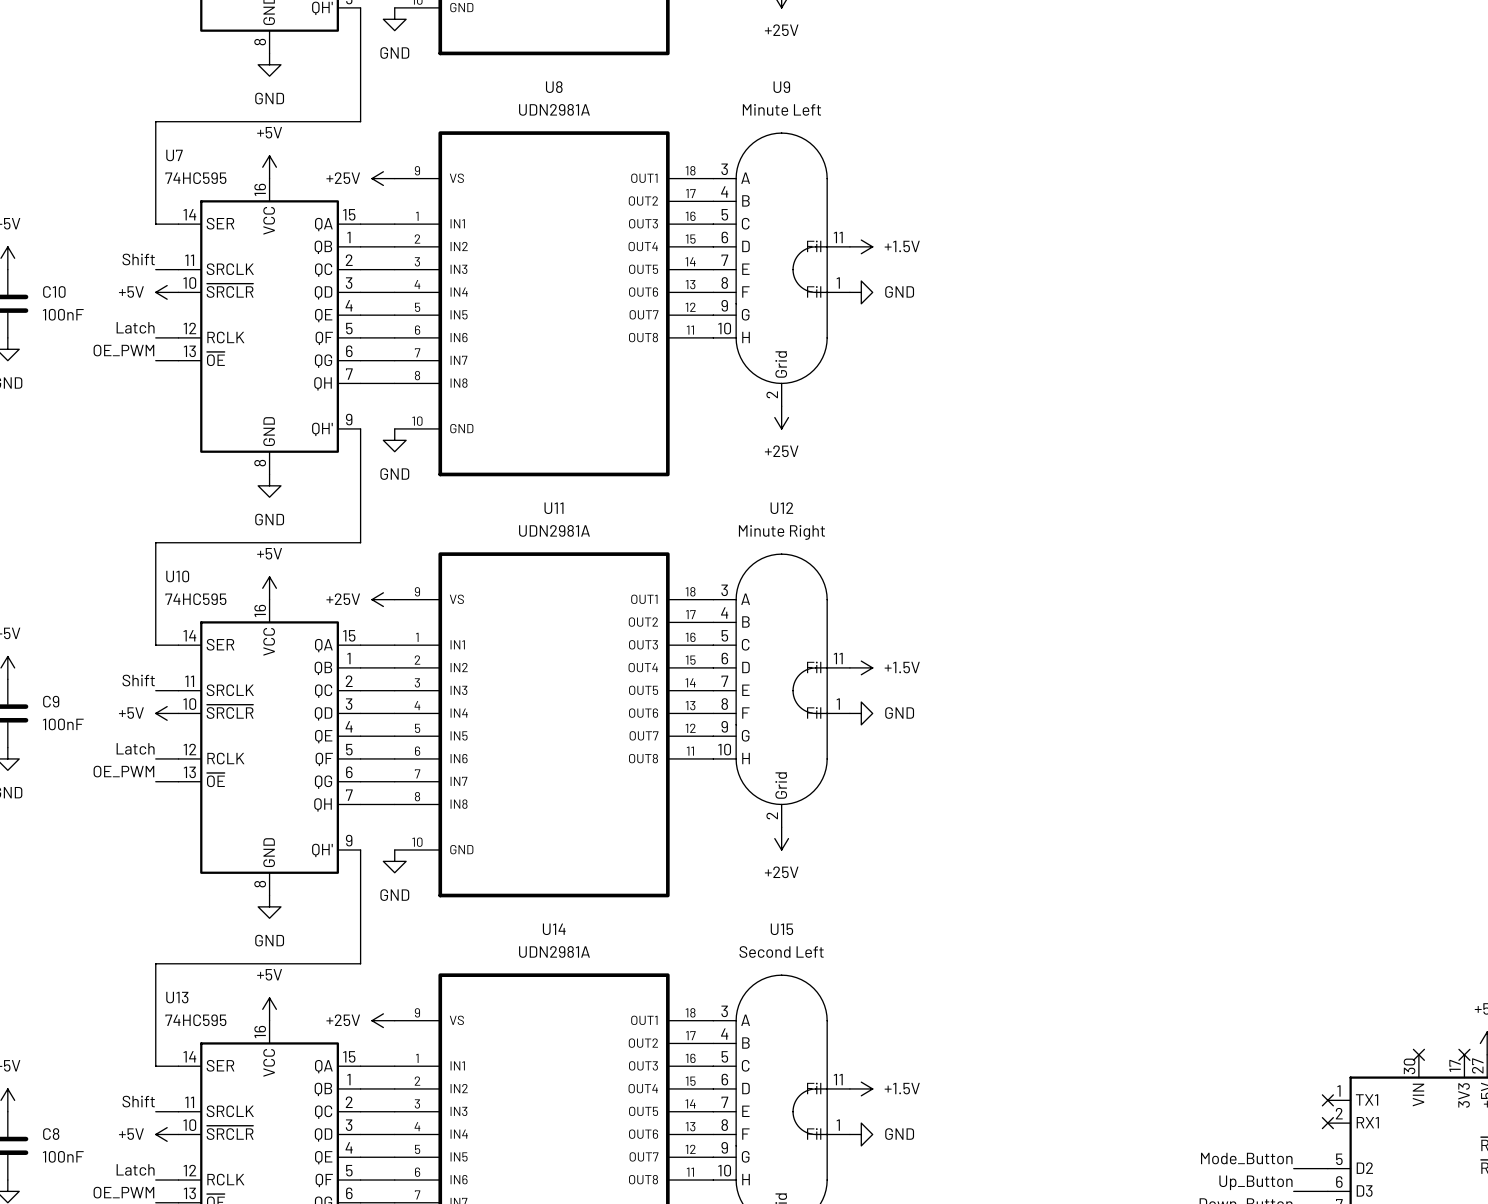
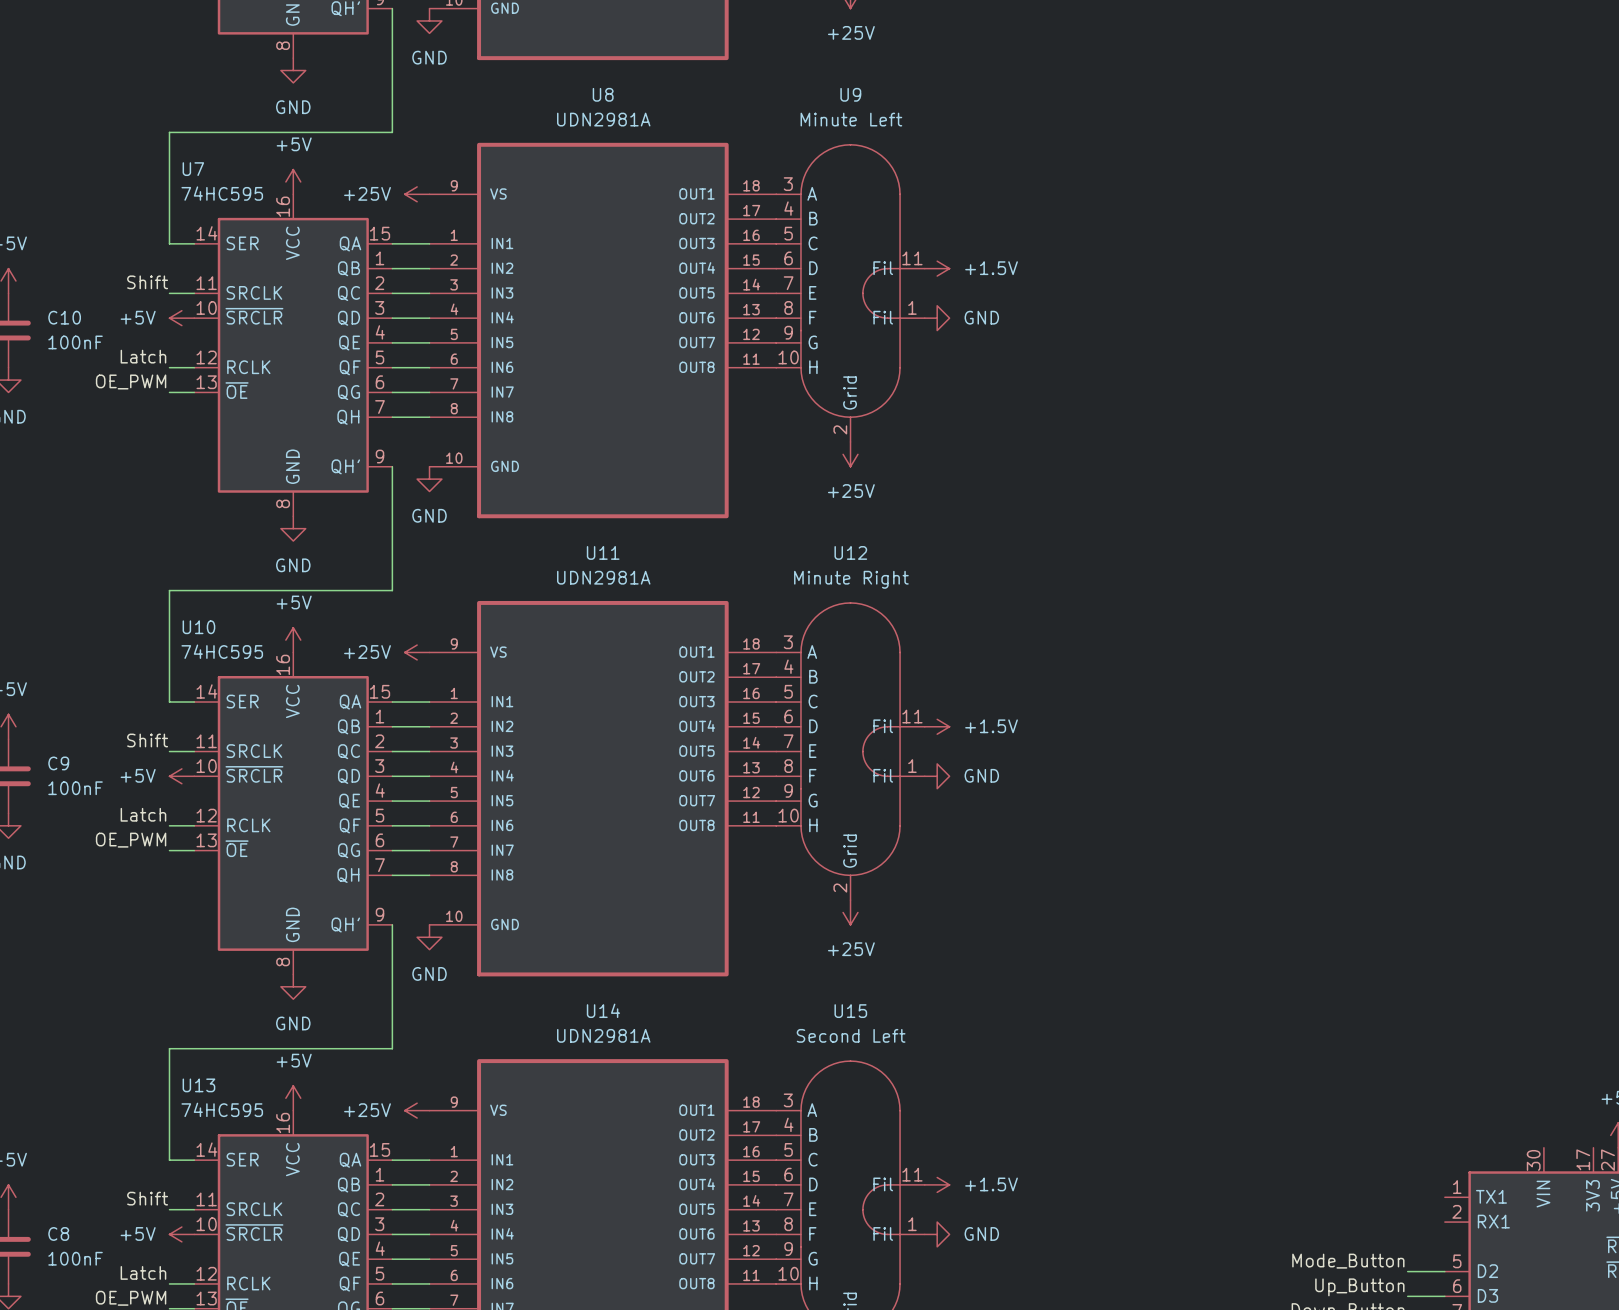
no-connect mark: (1418, 1054) -> none
no-connect mark: (1464, 1054) -> none
no-connect mark: (1327, 1100) -> none
no-connect mark: (1327, 1123) -> none

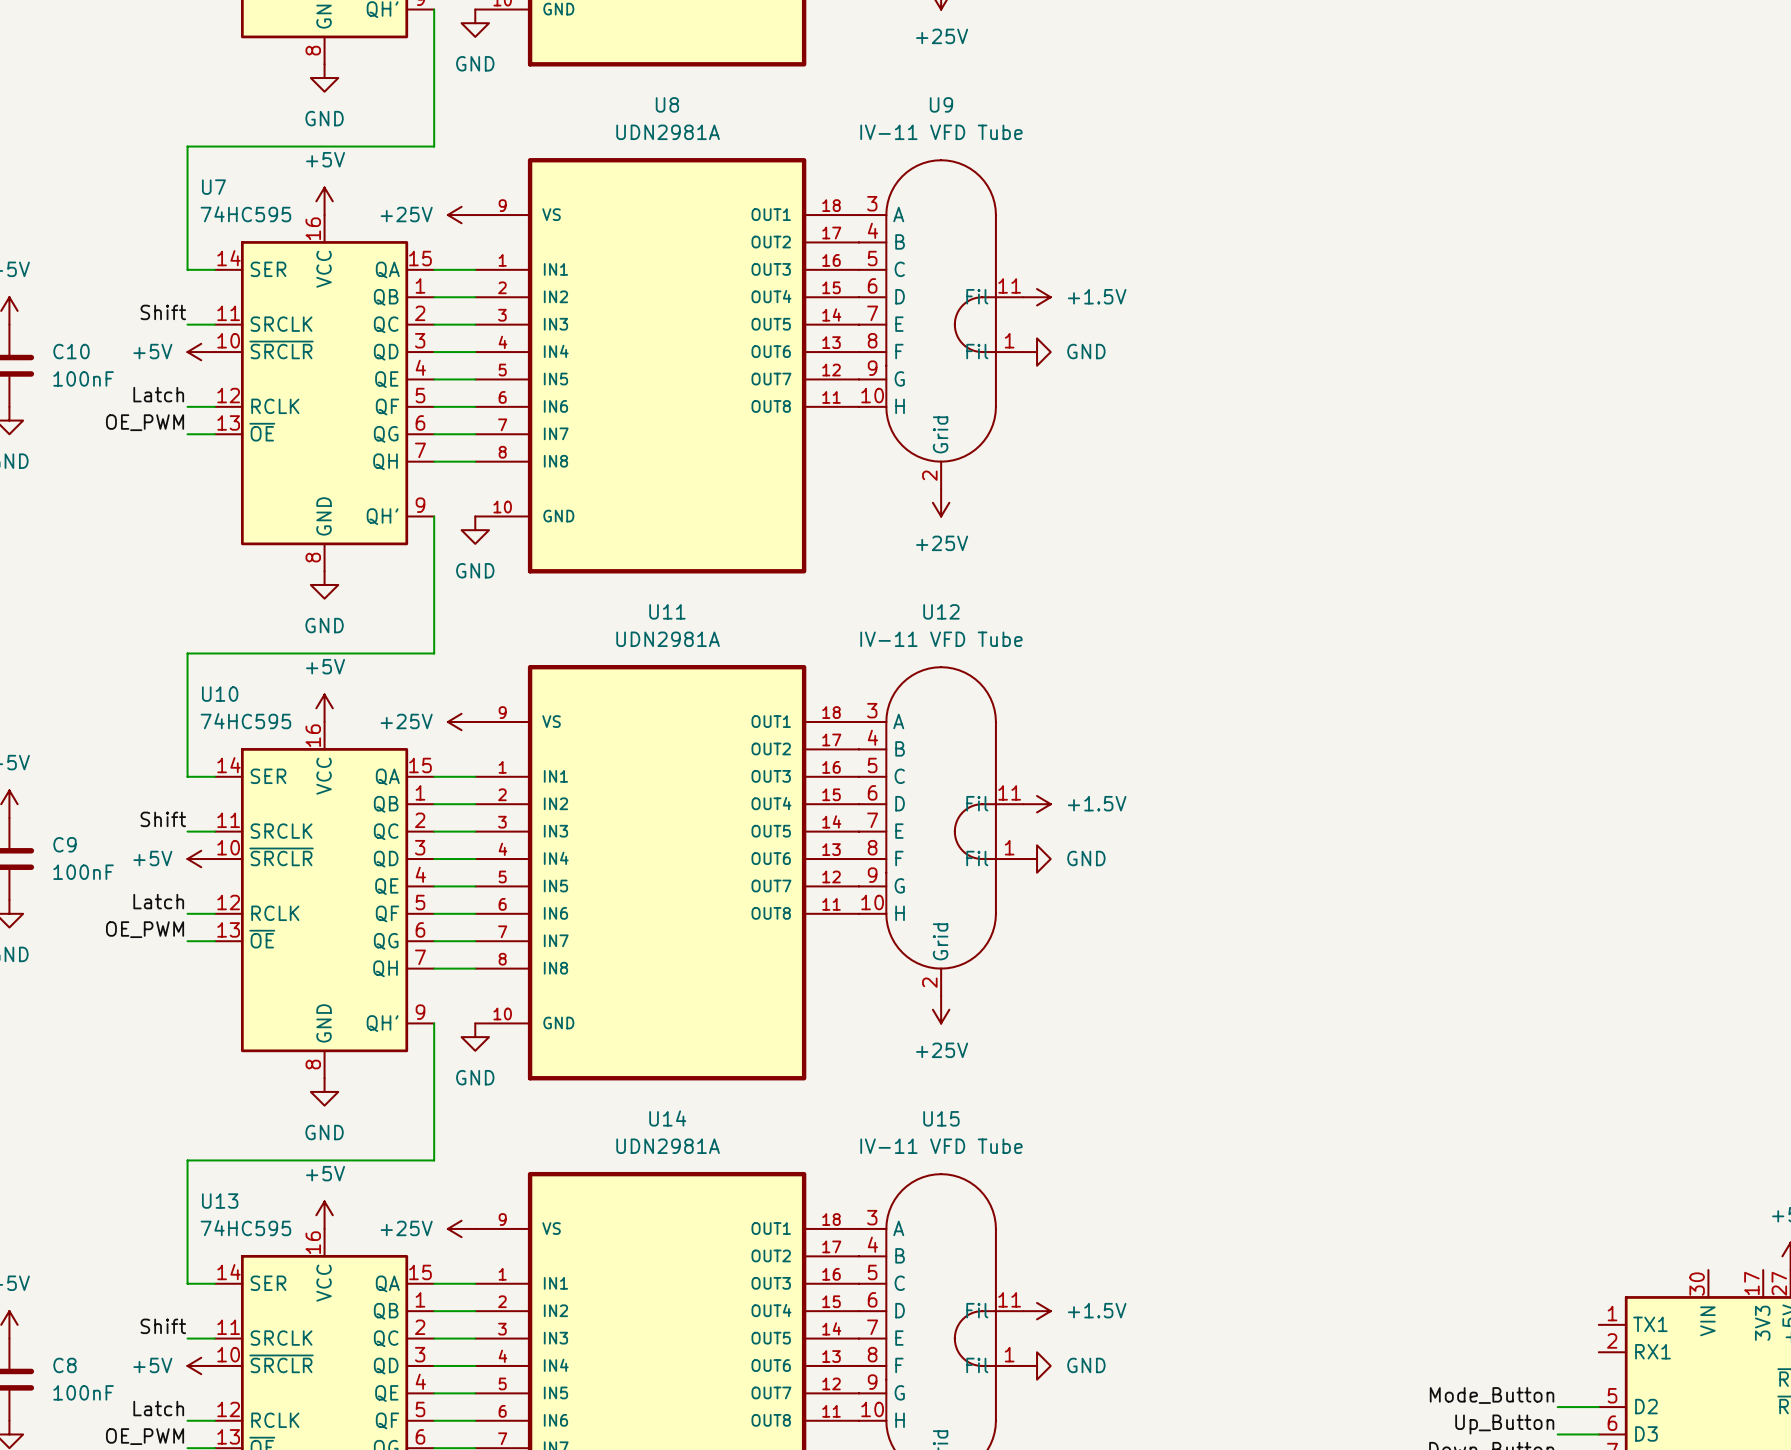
U9 value: Minute Left (851, 119) -> IV-11 VFD Tube (941, 132)
U12 value: Minute Right (851, 579) -> IV-11 VFD Tube (941, 639)
U15 value: Second Left (851, 1035) -> IV-11 VFD Tube (941, 1146)

